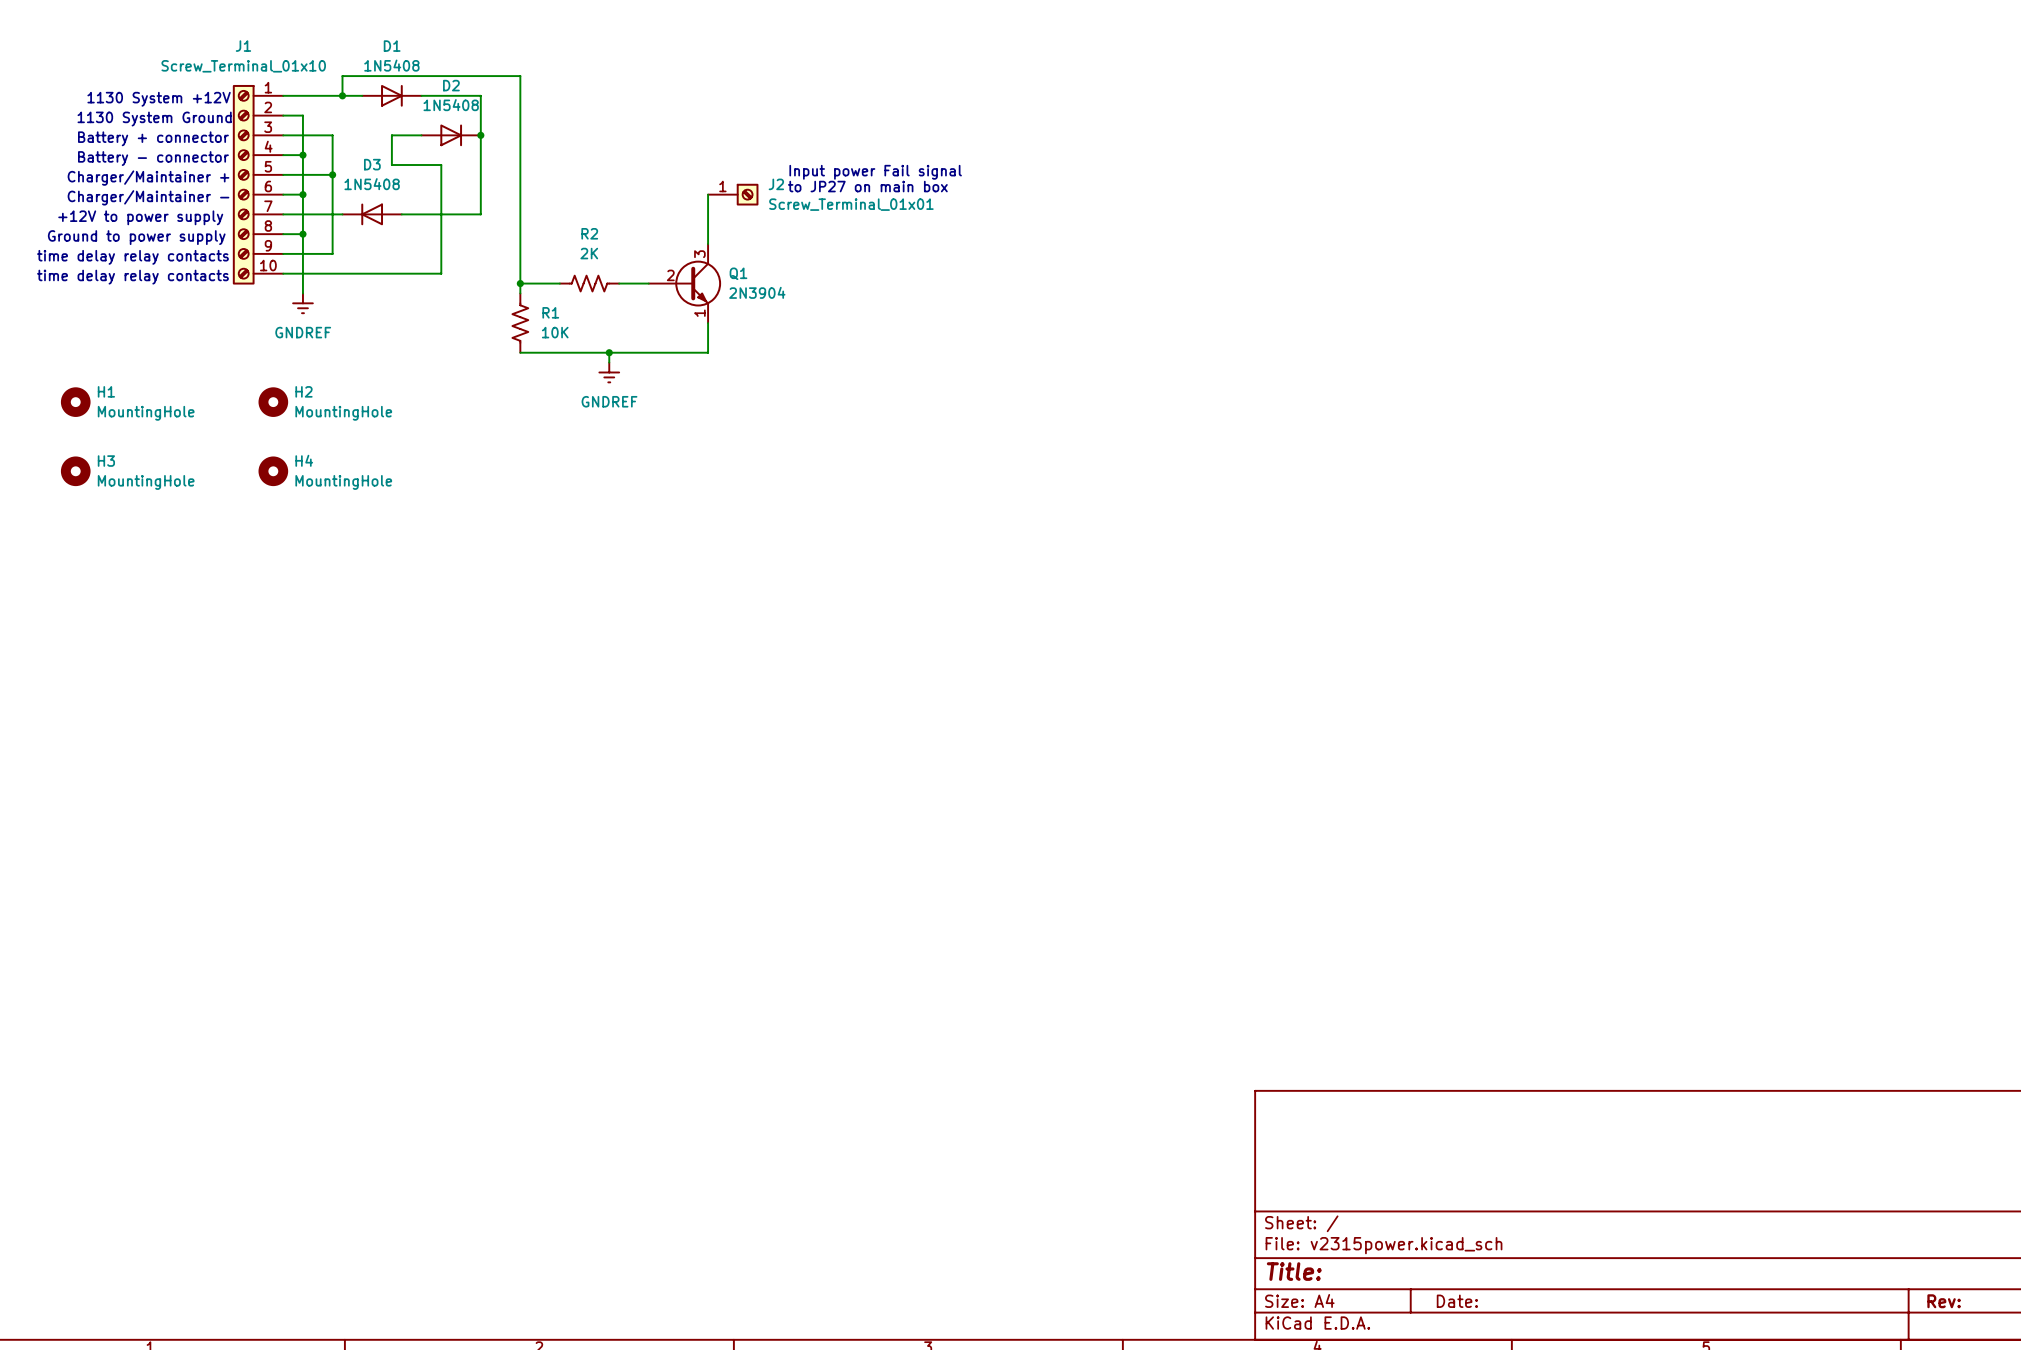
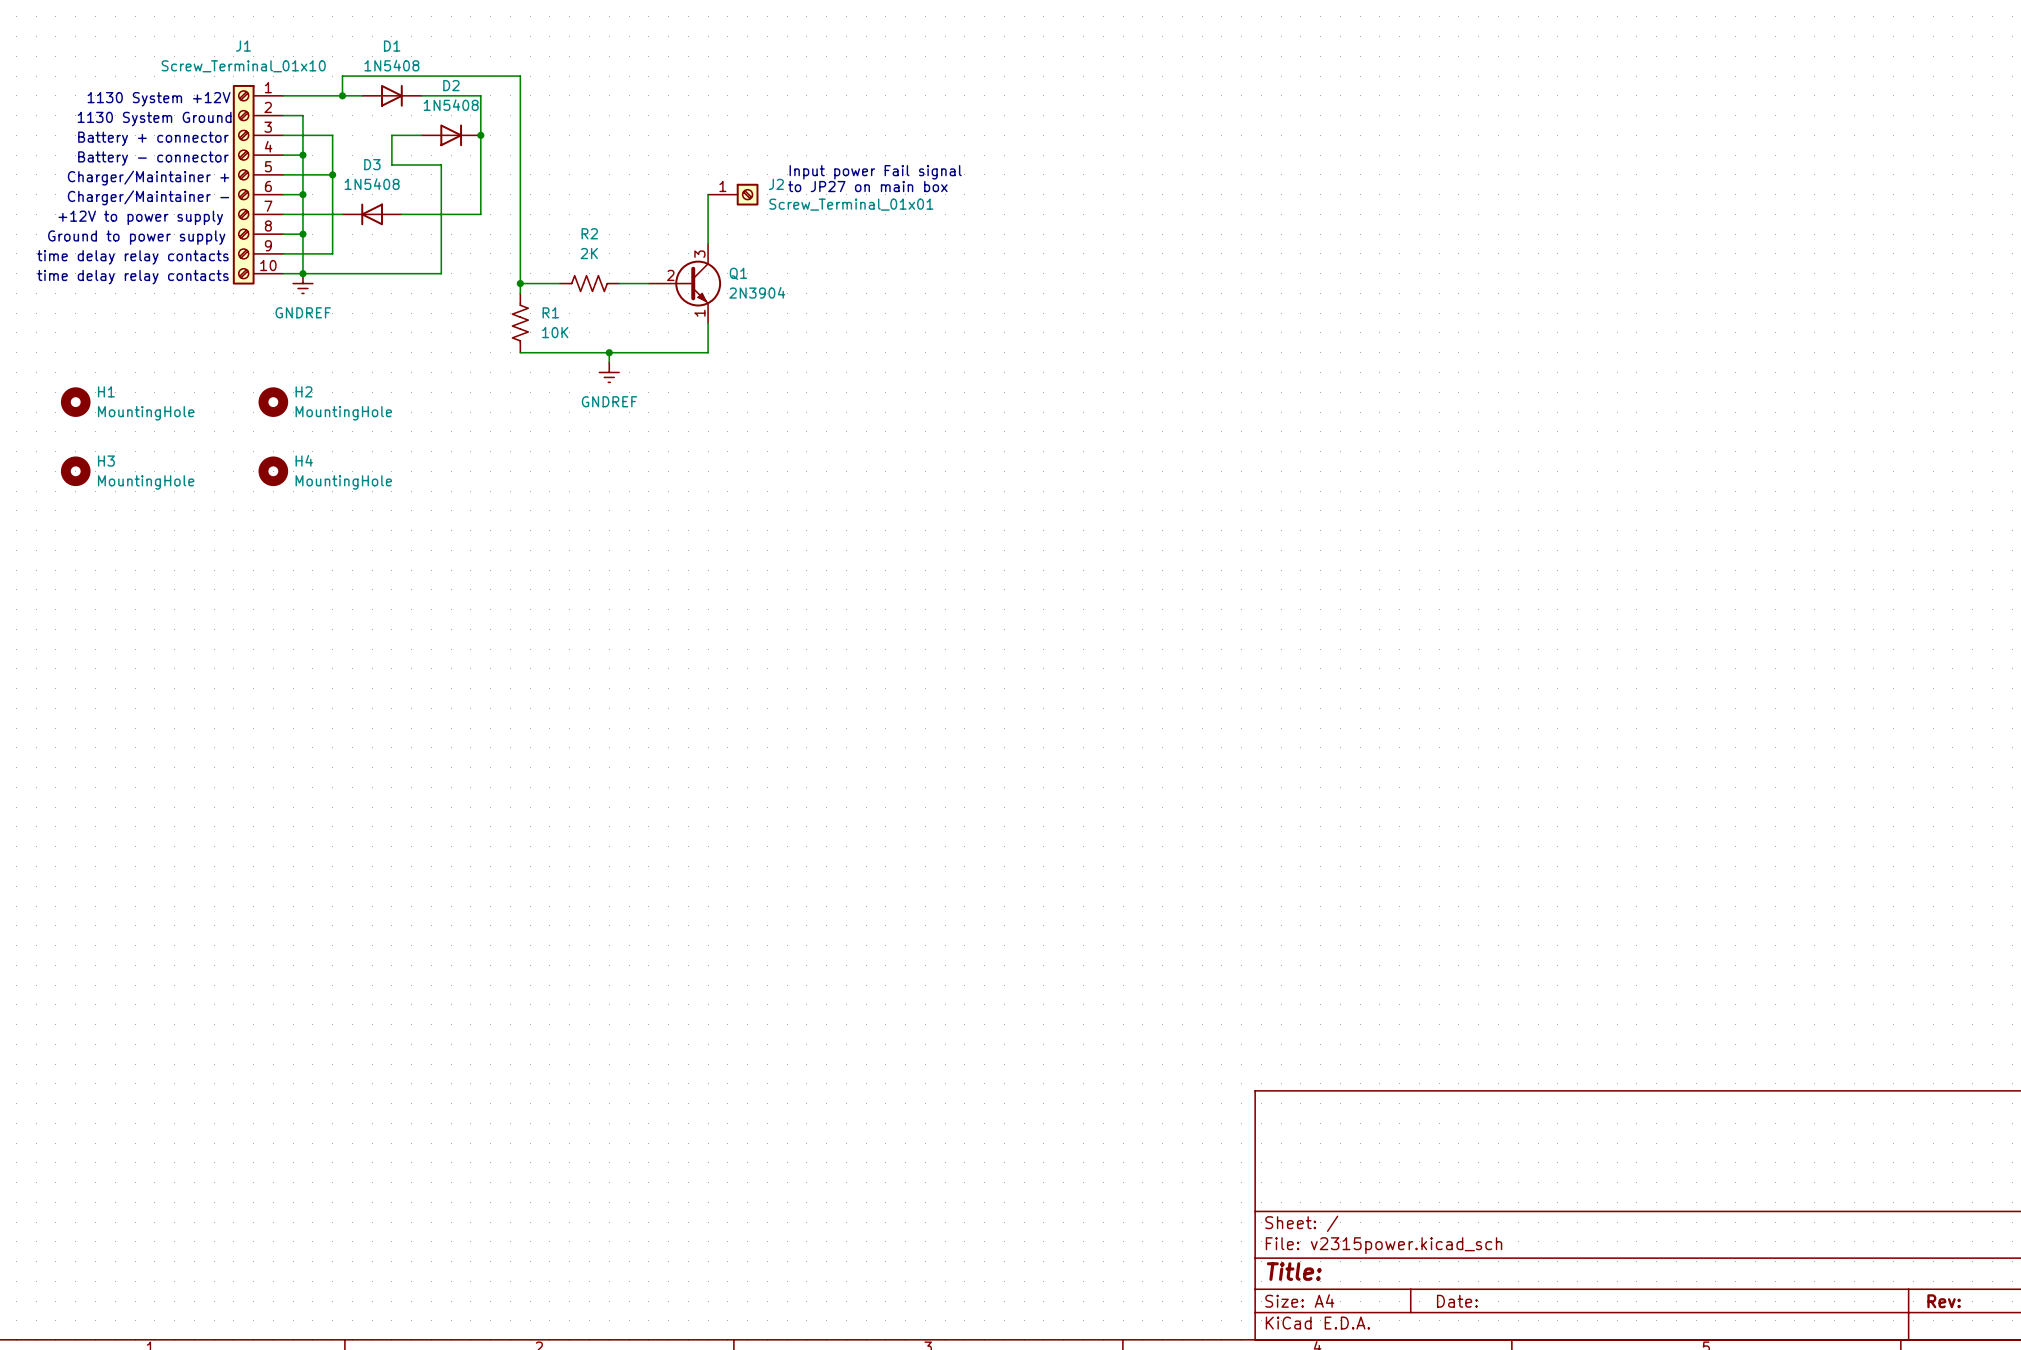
junction: none -> (302, 273)
power symbol position: GNDREF (302, 303) -> GNDREF (302, 283)

